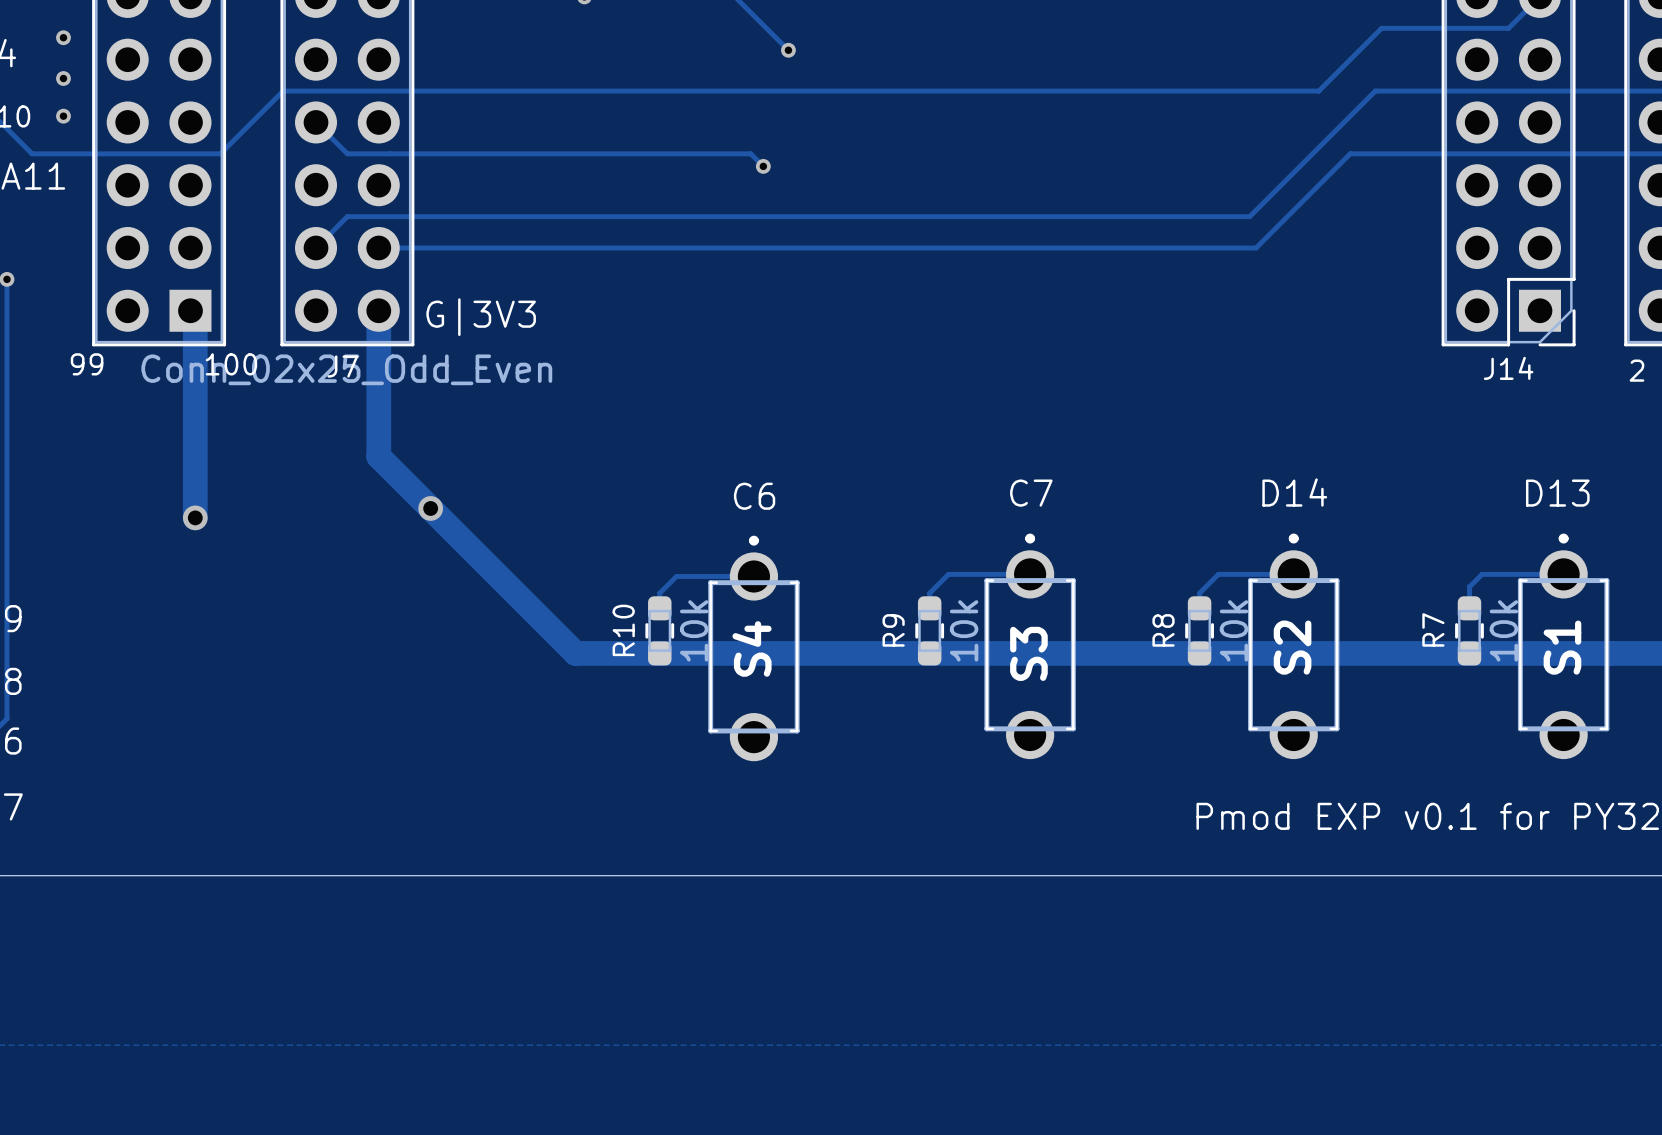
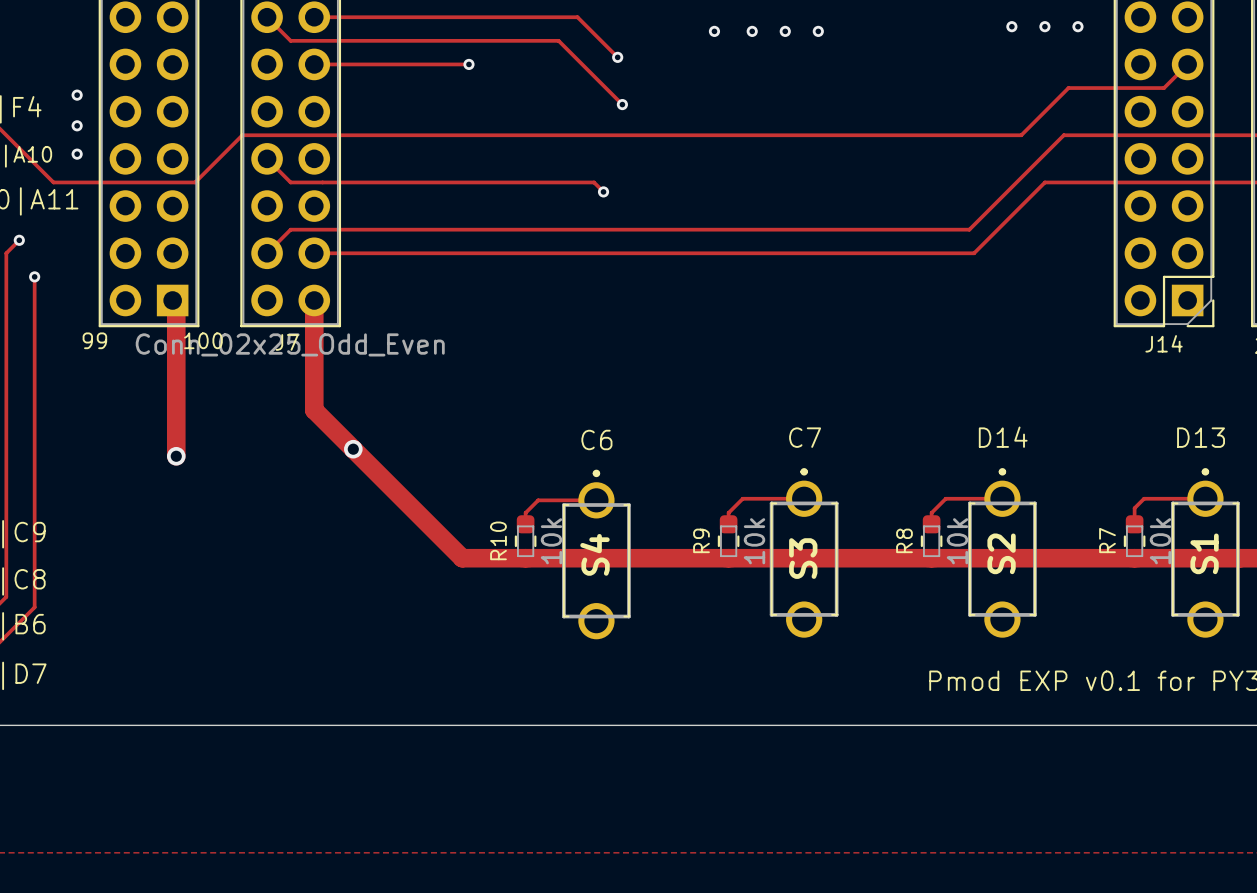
text: G|3V3 (481, 317) -> none

